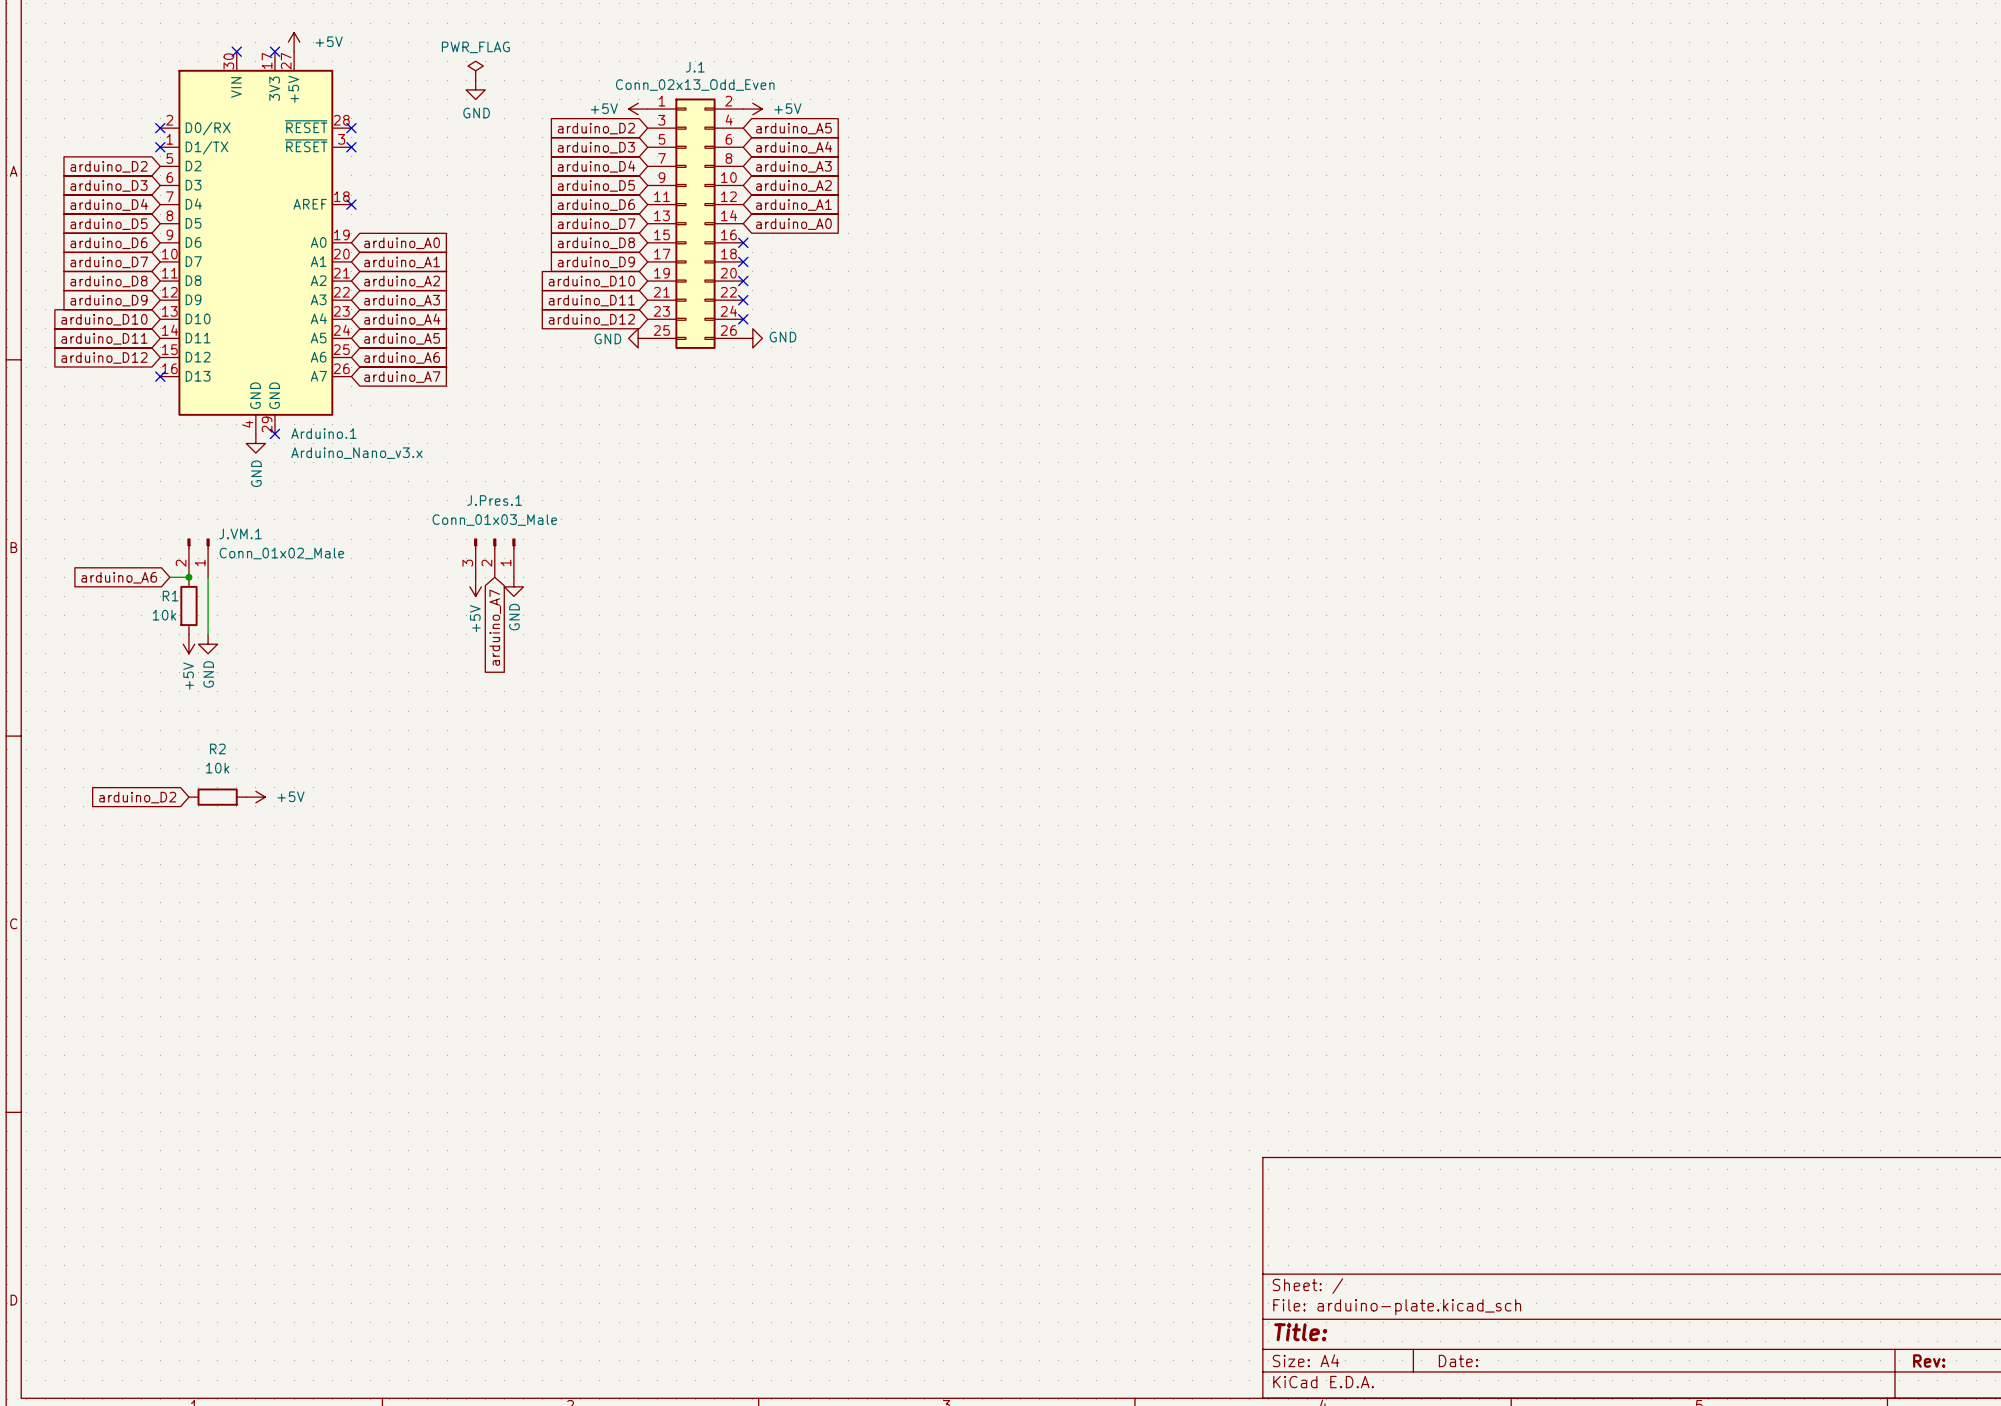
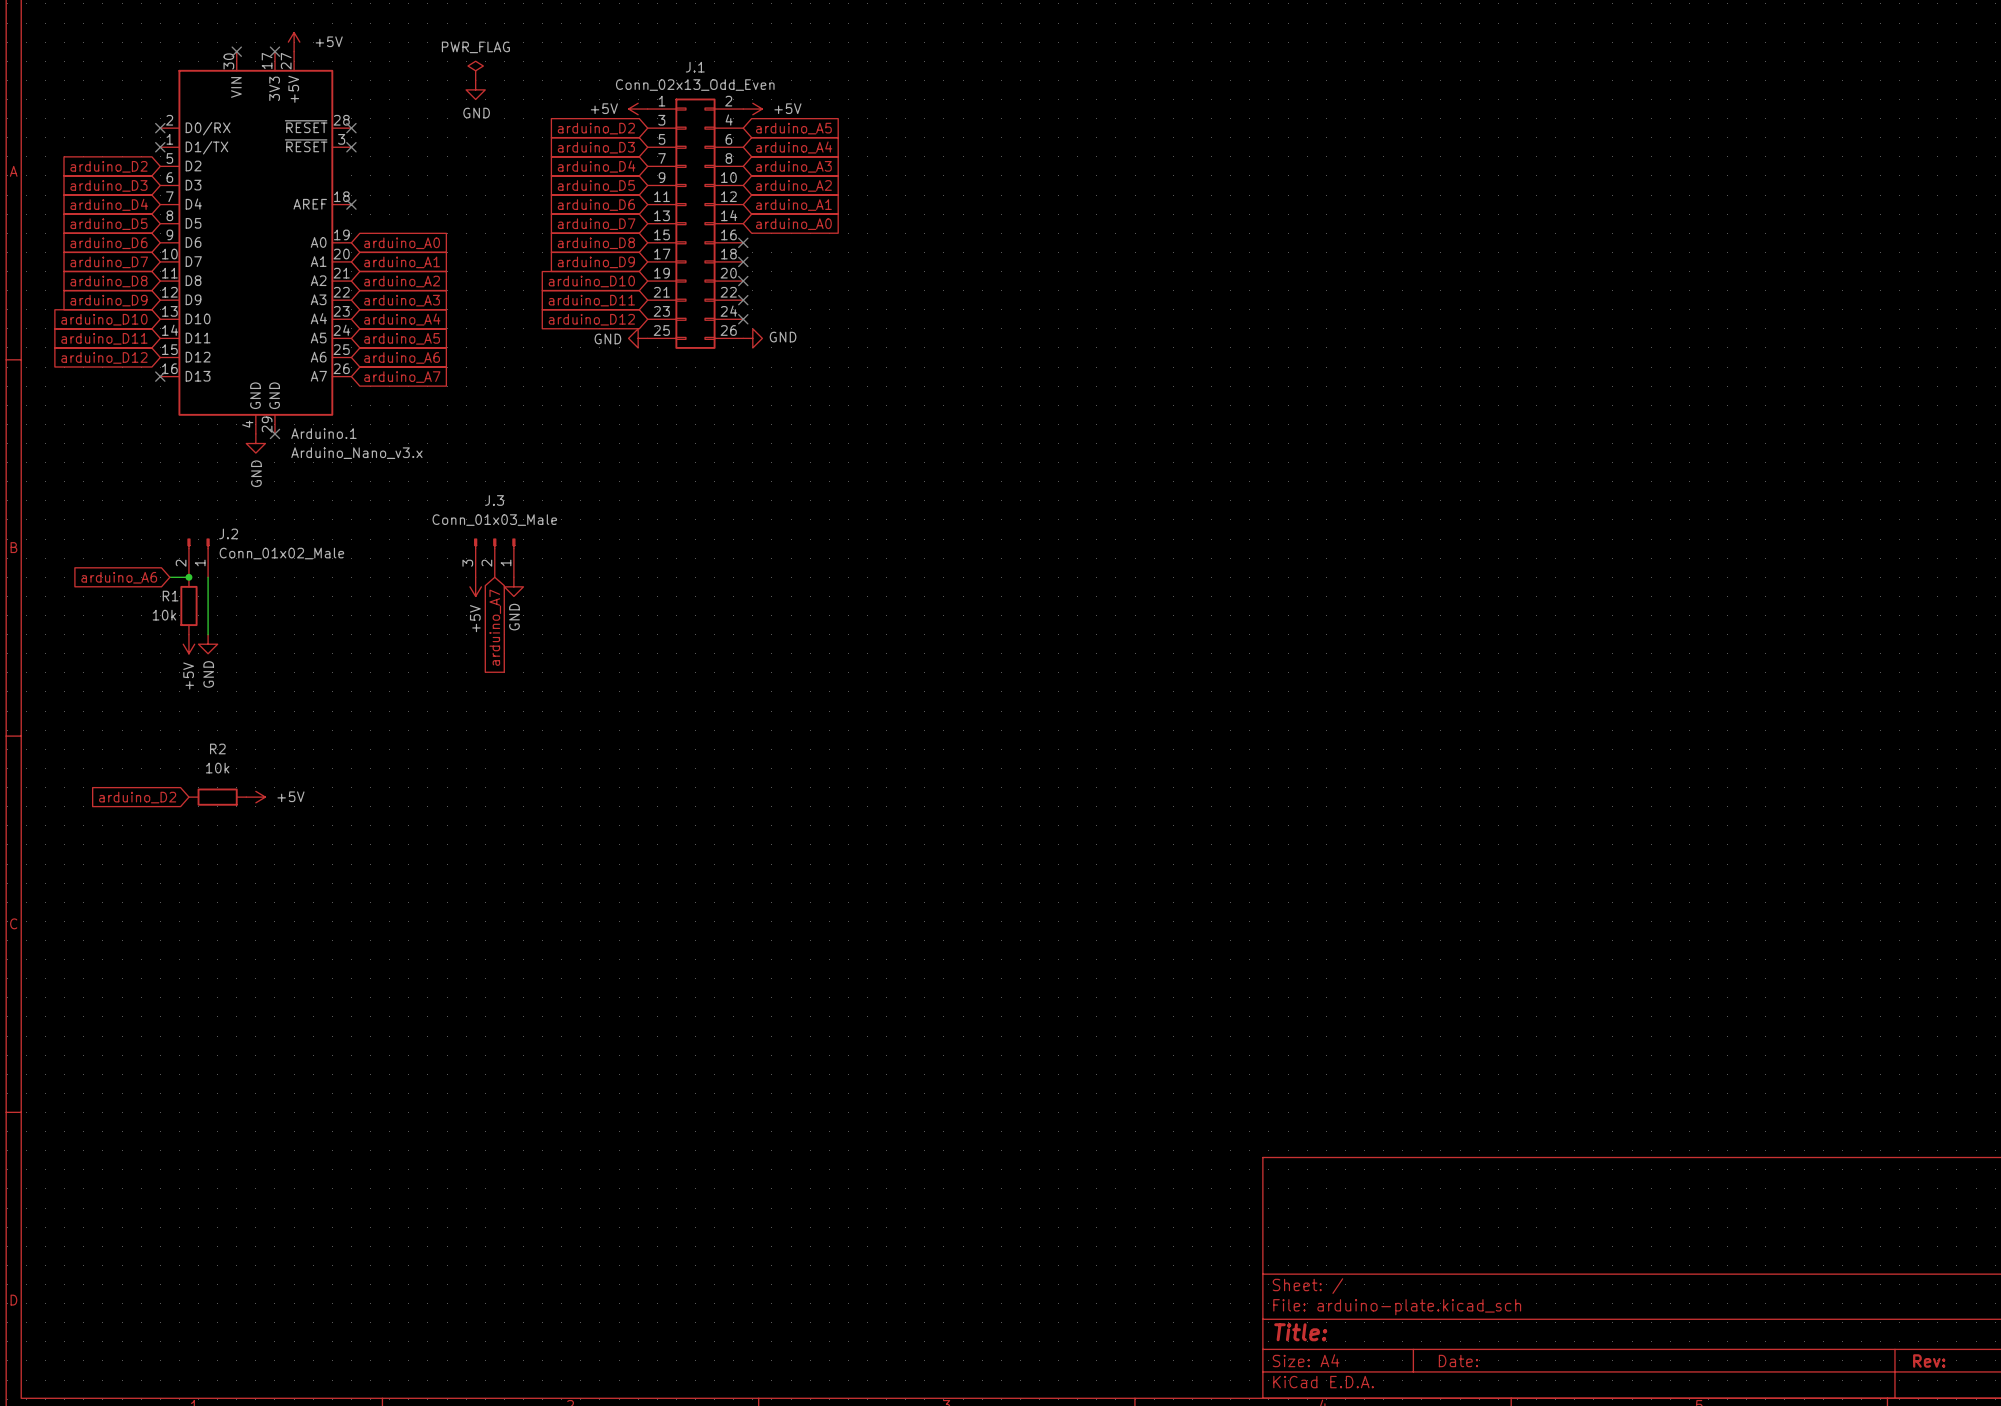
J.Pres.1 name: J.Pres.1 (494, 500) -> J.3 (494, 500)
J.VM.1 name: J.VM.1 (240, 533) -> J.2 (228, 533)

